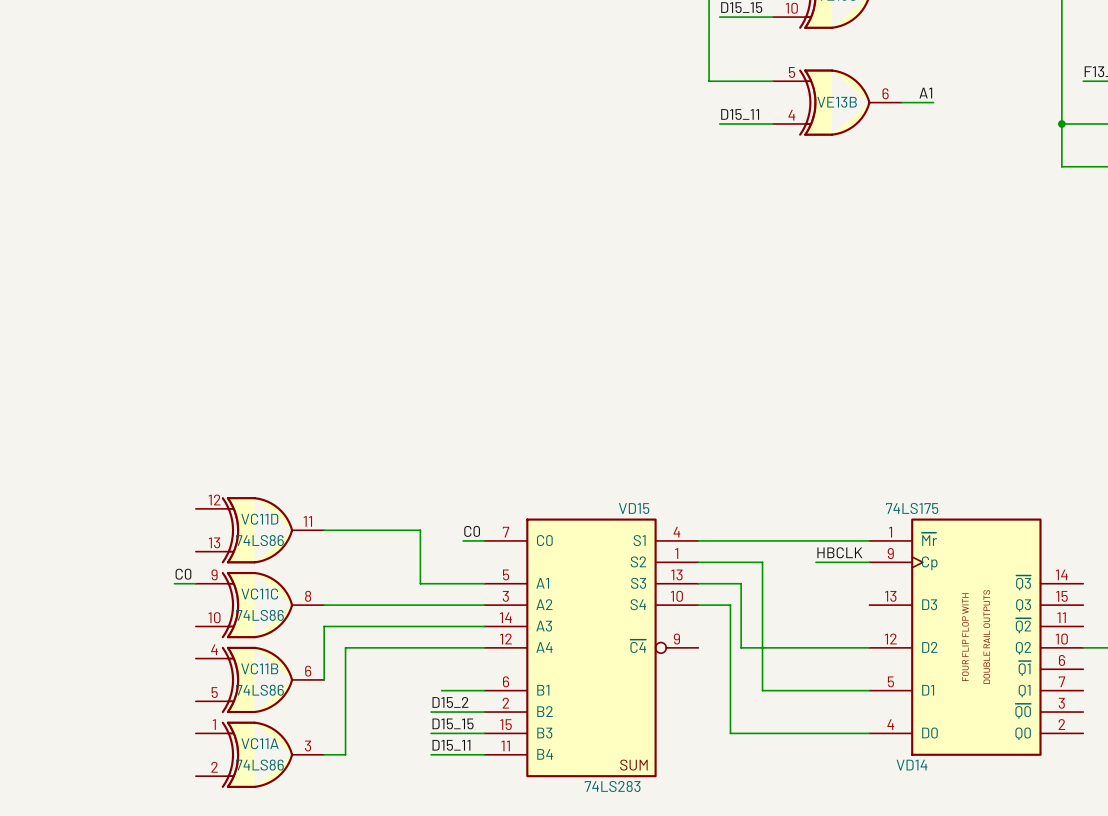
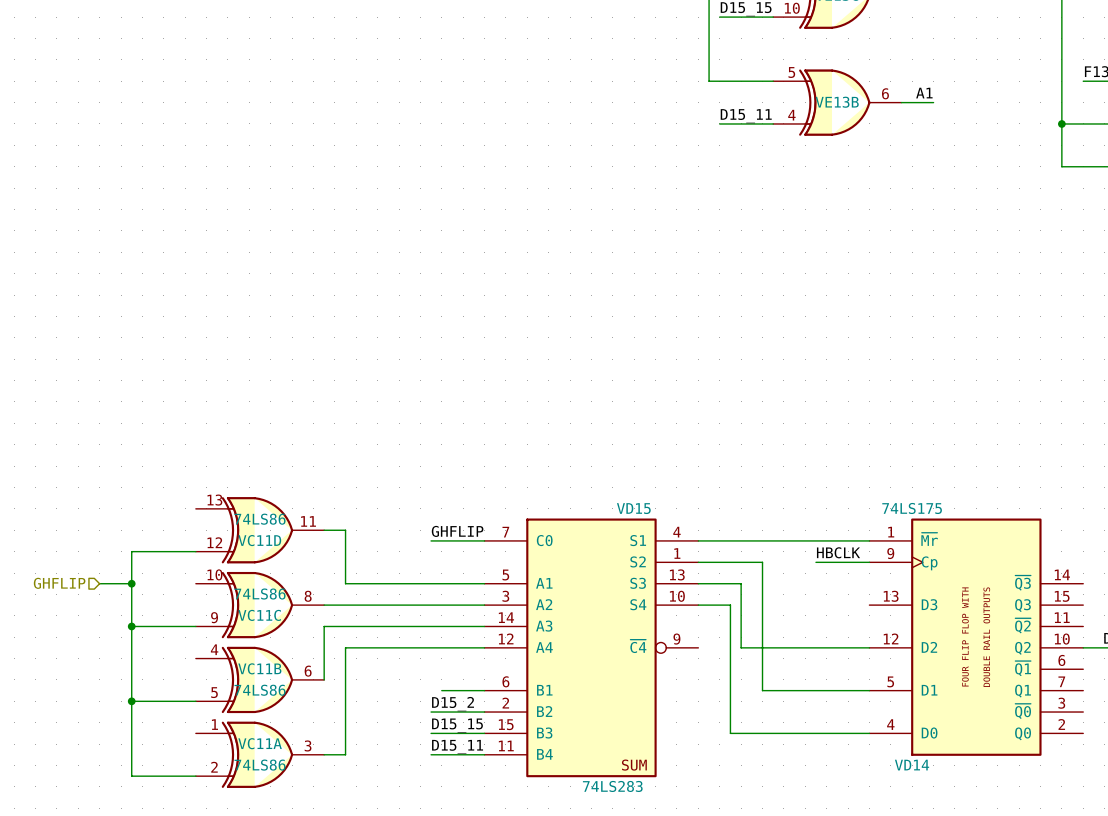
VC11D flip: as is (257, 530) -> up-down (257, 530)
wire: (345, 530) (420, 530) (420, 583) -> (345, 530) (345, 583) (420, 583)
label: none -> GHFLIP (457, 531)
label: C0 (472, 531) -> none
wire: none -> (431, 540) (463, 540)
wire: none -> (195, 551) (131, 551) (131, 776) (195, 776)
label: C0 (183, 574) -> none
hierarchical label: none -> GHFLIP (59, 583)
wire: none -> (99, 583) (131, 583)
junction: none -> (131, 583)
wire: (174, 583) (195, 583) -> none
VC11C flip: as is (257, 605) -> up-down (257, 605)
wire: none -> (131, 626) (195, 626)
junction: none -> (131, 626)
wire: none -> (131, 701) (195, 701)
junction: none -> (131, 701)

